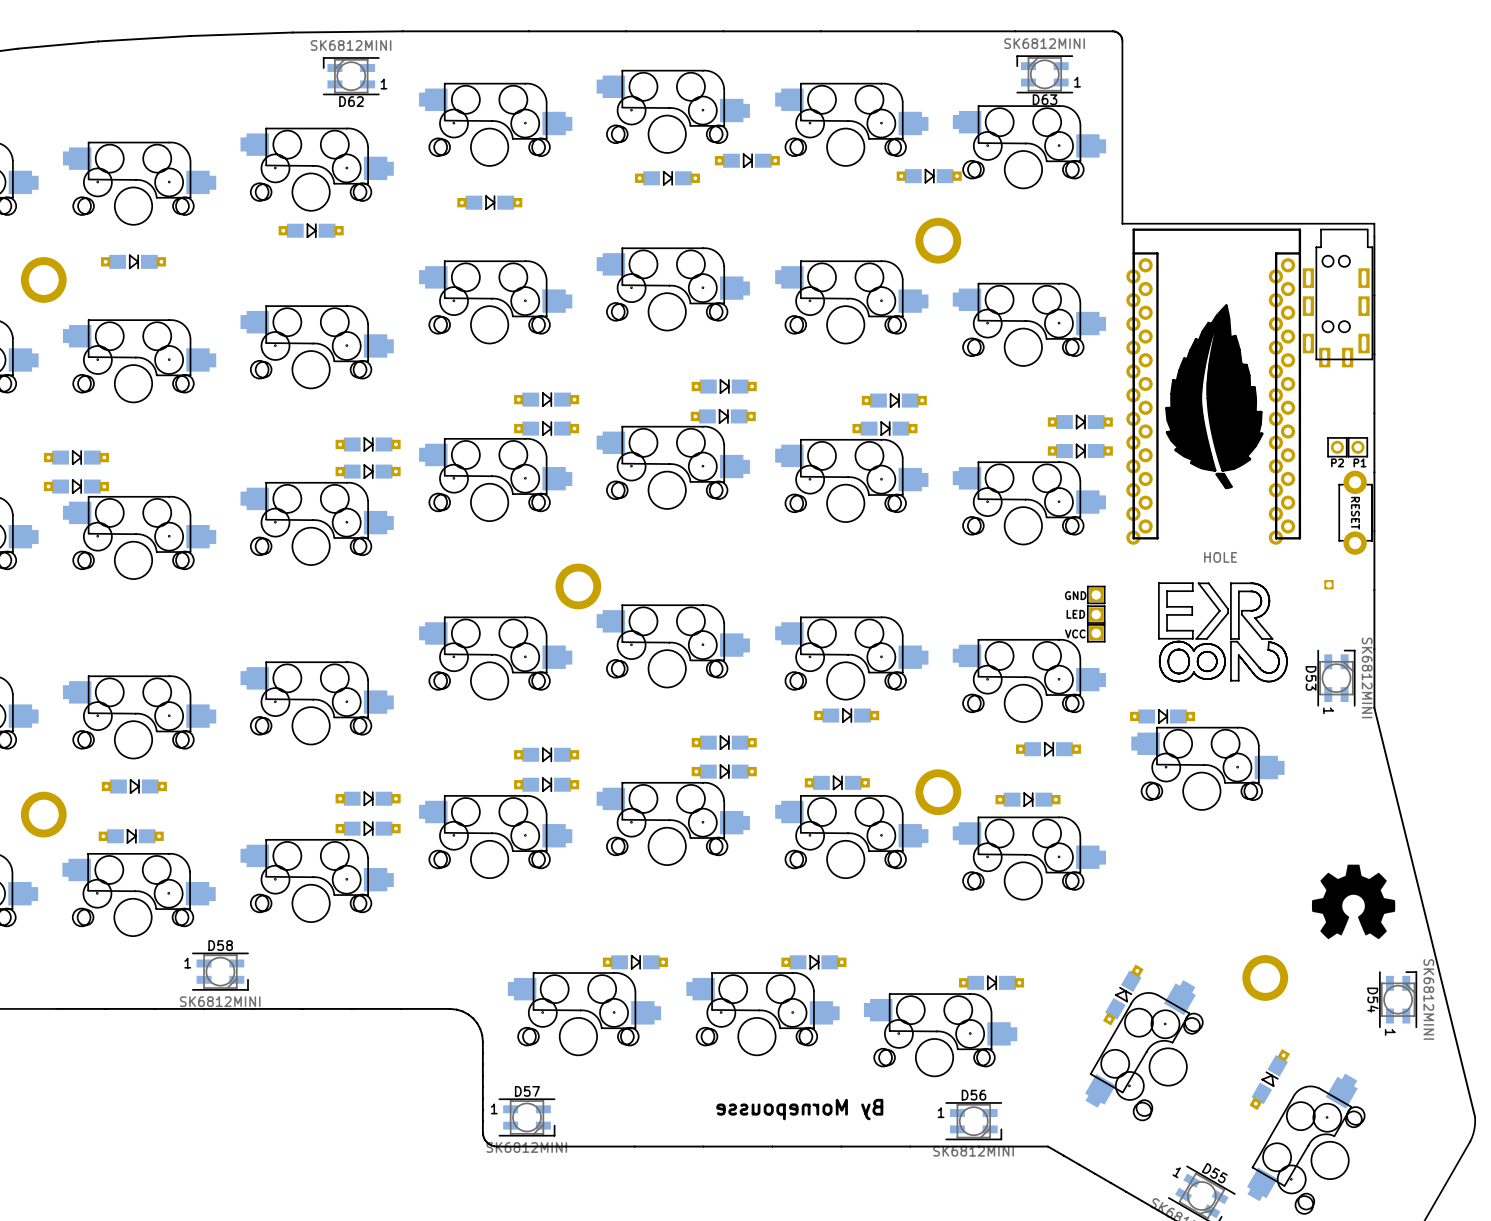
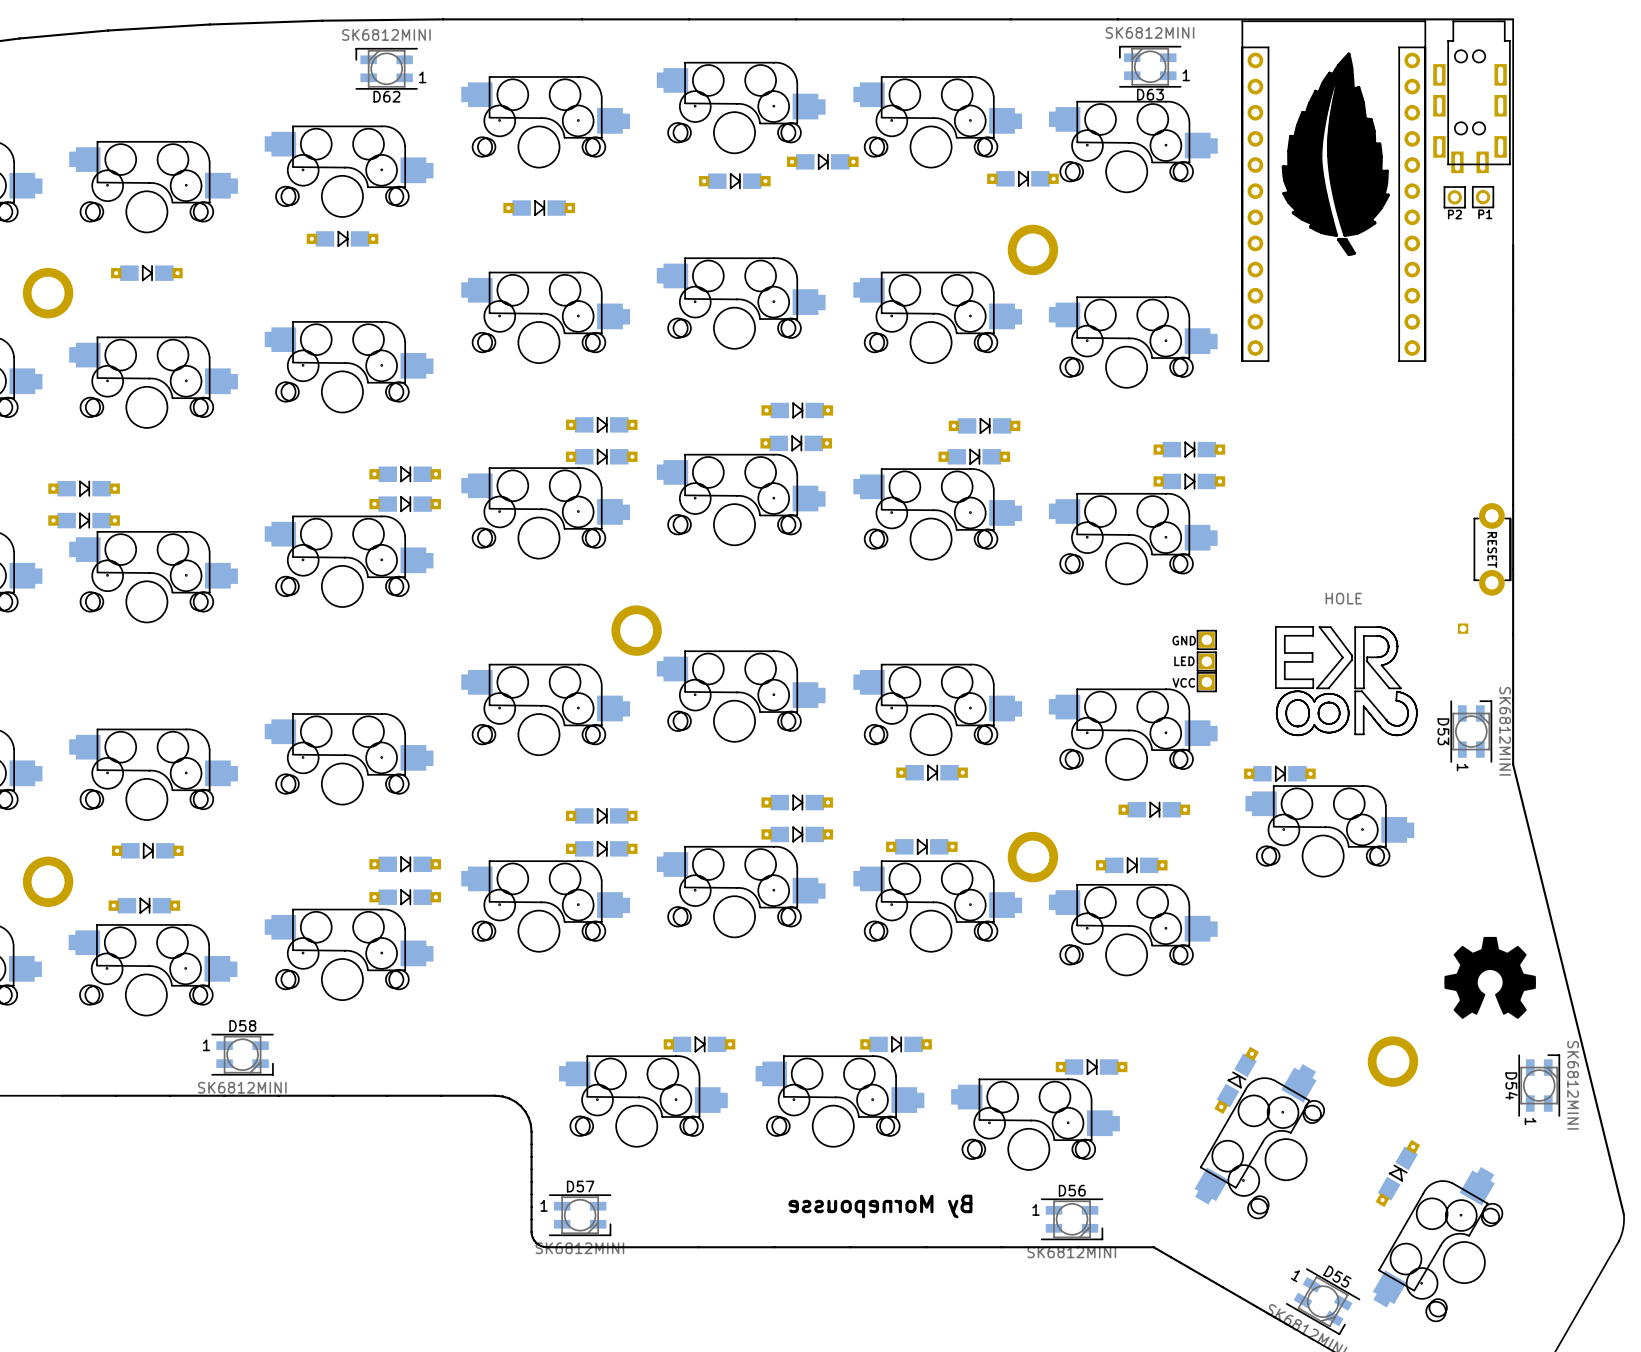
board edge: (1112, 31) (1119, 34) (1122, 41) (1122, 223) (1374, 223) (1374, 236) -> (1224, 19) (1513, 19) (1513, 245)
drawing: none -> [1281, 52, 1390, 256]
part: none -> (1333, 191)
part: none -> (1454, 197)
part: none -> (1483, 197)
part position: (1337, 298) -> (1471, 96)
drawing: [1165, 304, 1264, 490] -> none
part: (1213, 386) -> none
part: (1337, 447) -> none
part: (1357, 447) -> none

